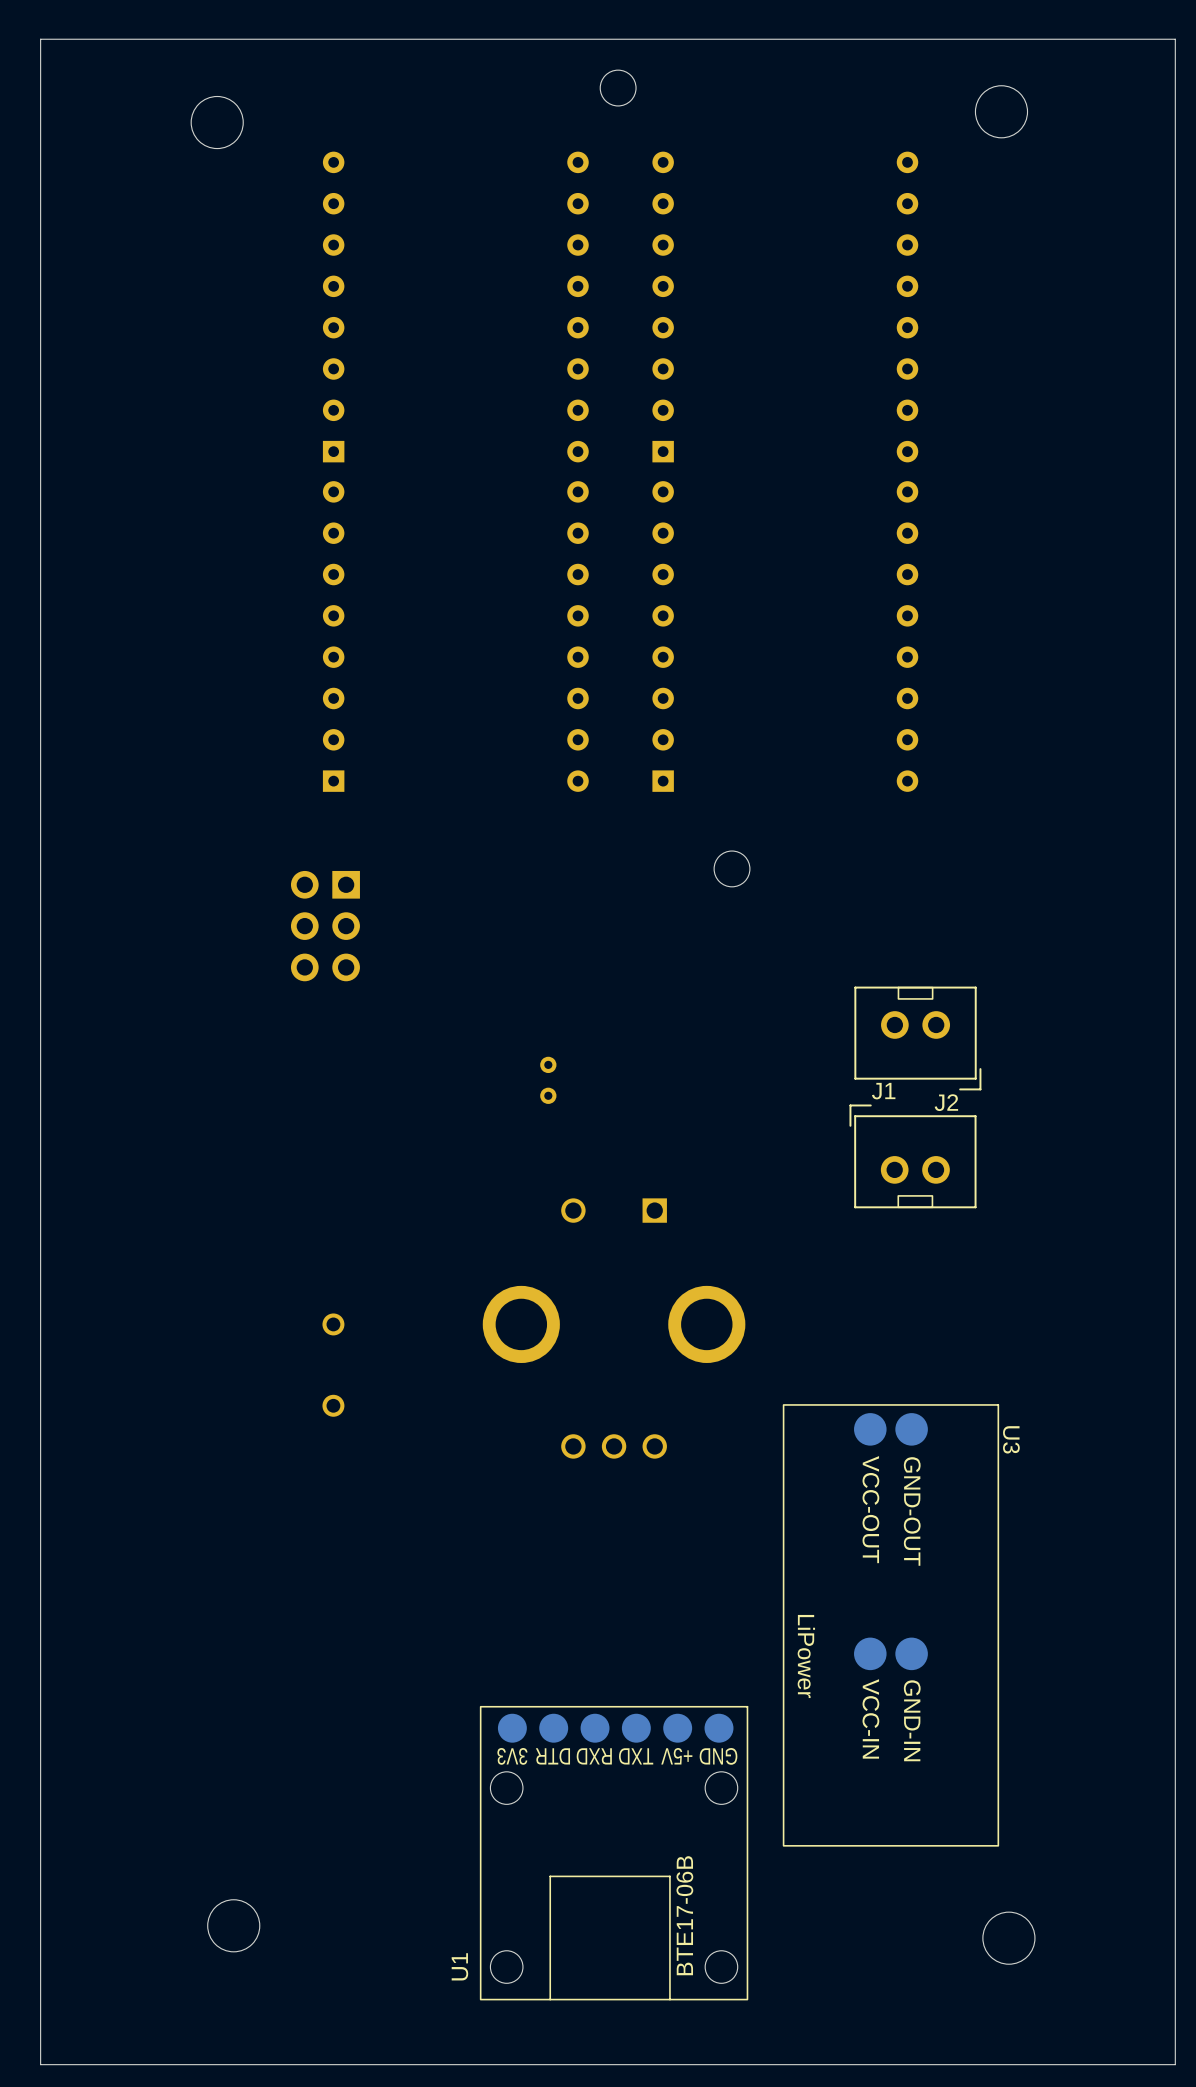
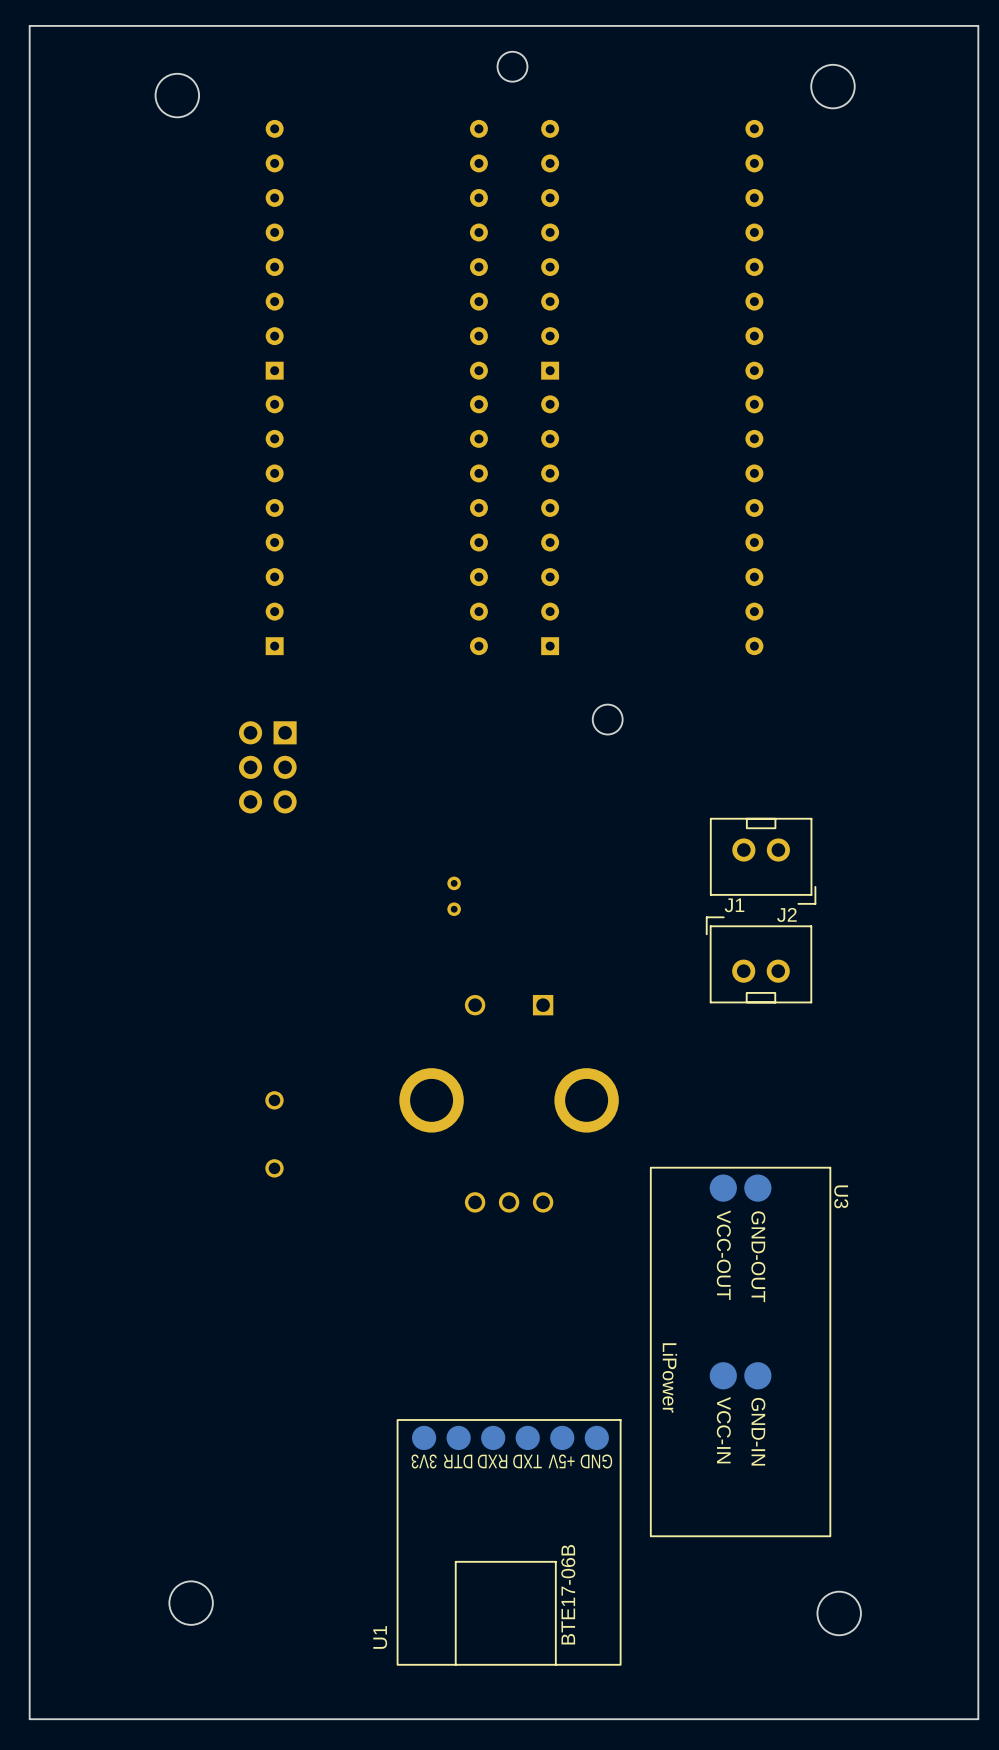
U1 footprint: [479, 1705, 749, 2001] -> [396, 1419, 622, 1666]

